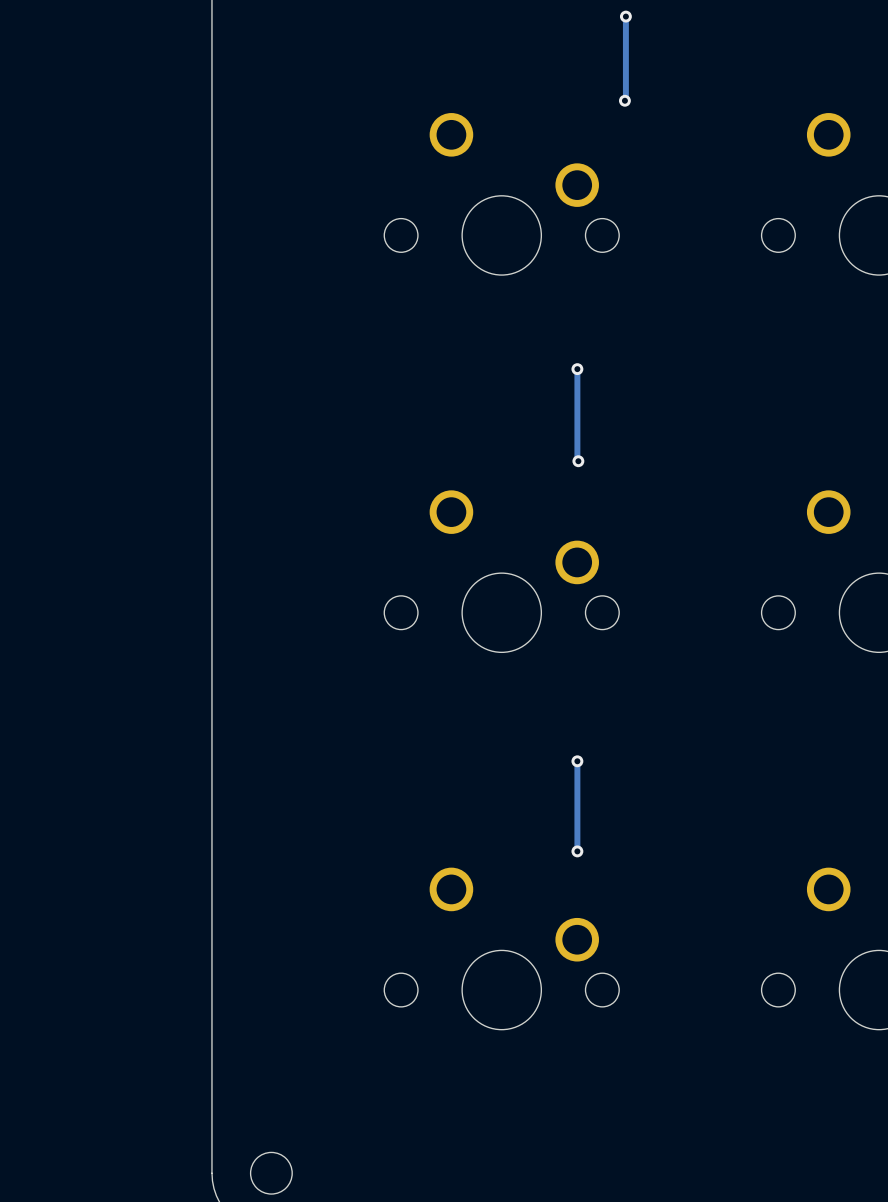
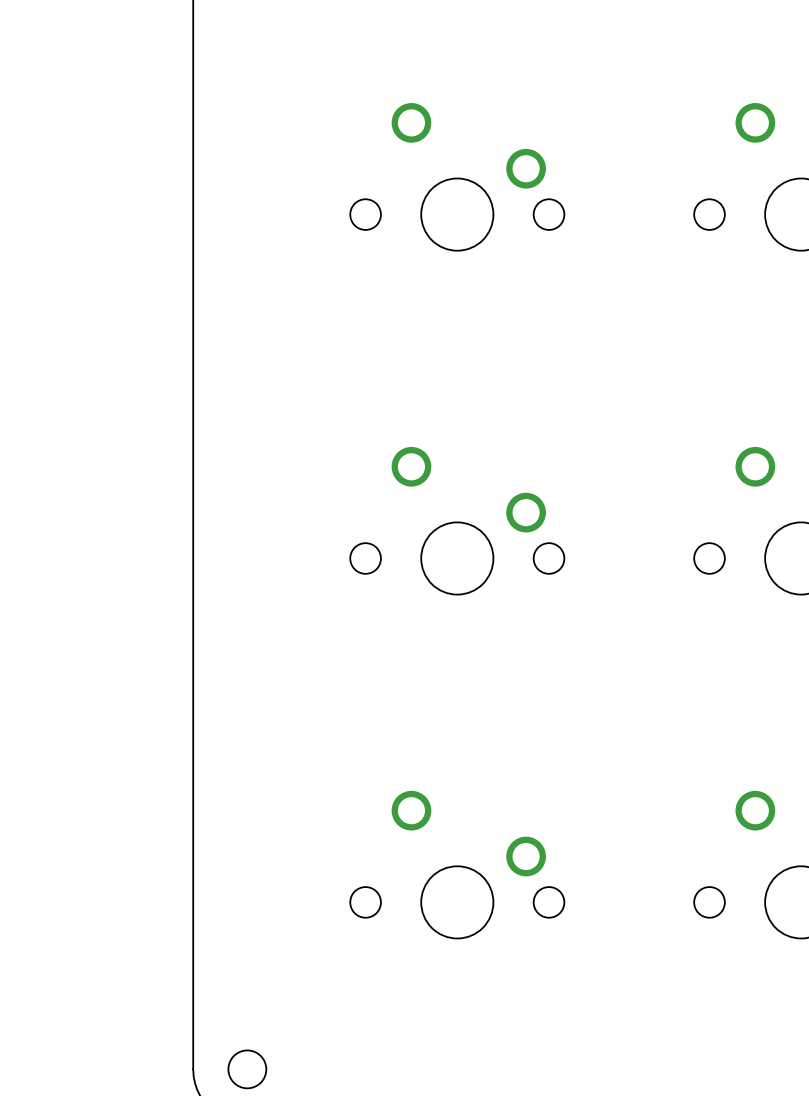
track: (625, 16) (624, 100) -> none
via: (625, 16) -> none
via: (624, 100) -> none
track: (577, 369) (578, 461) -> none
via: (577, 369) -> none
via: (578, 461) -> none
track: (577, 761) (577, 851) -> none
via: (577, 761) -> none
via: (577, 851) -> none

